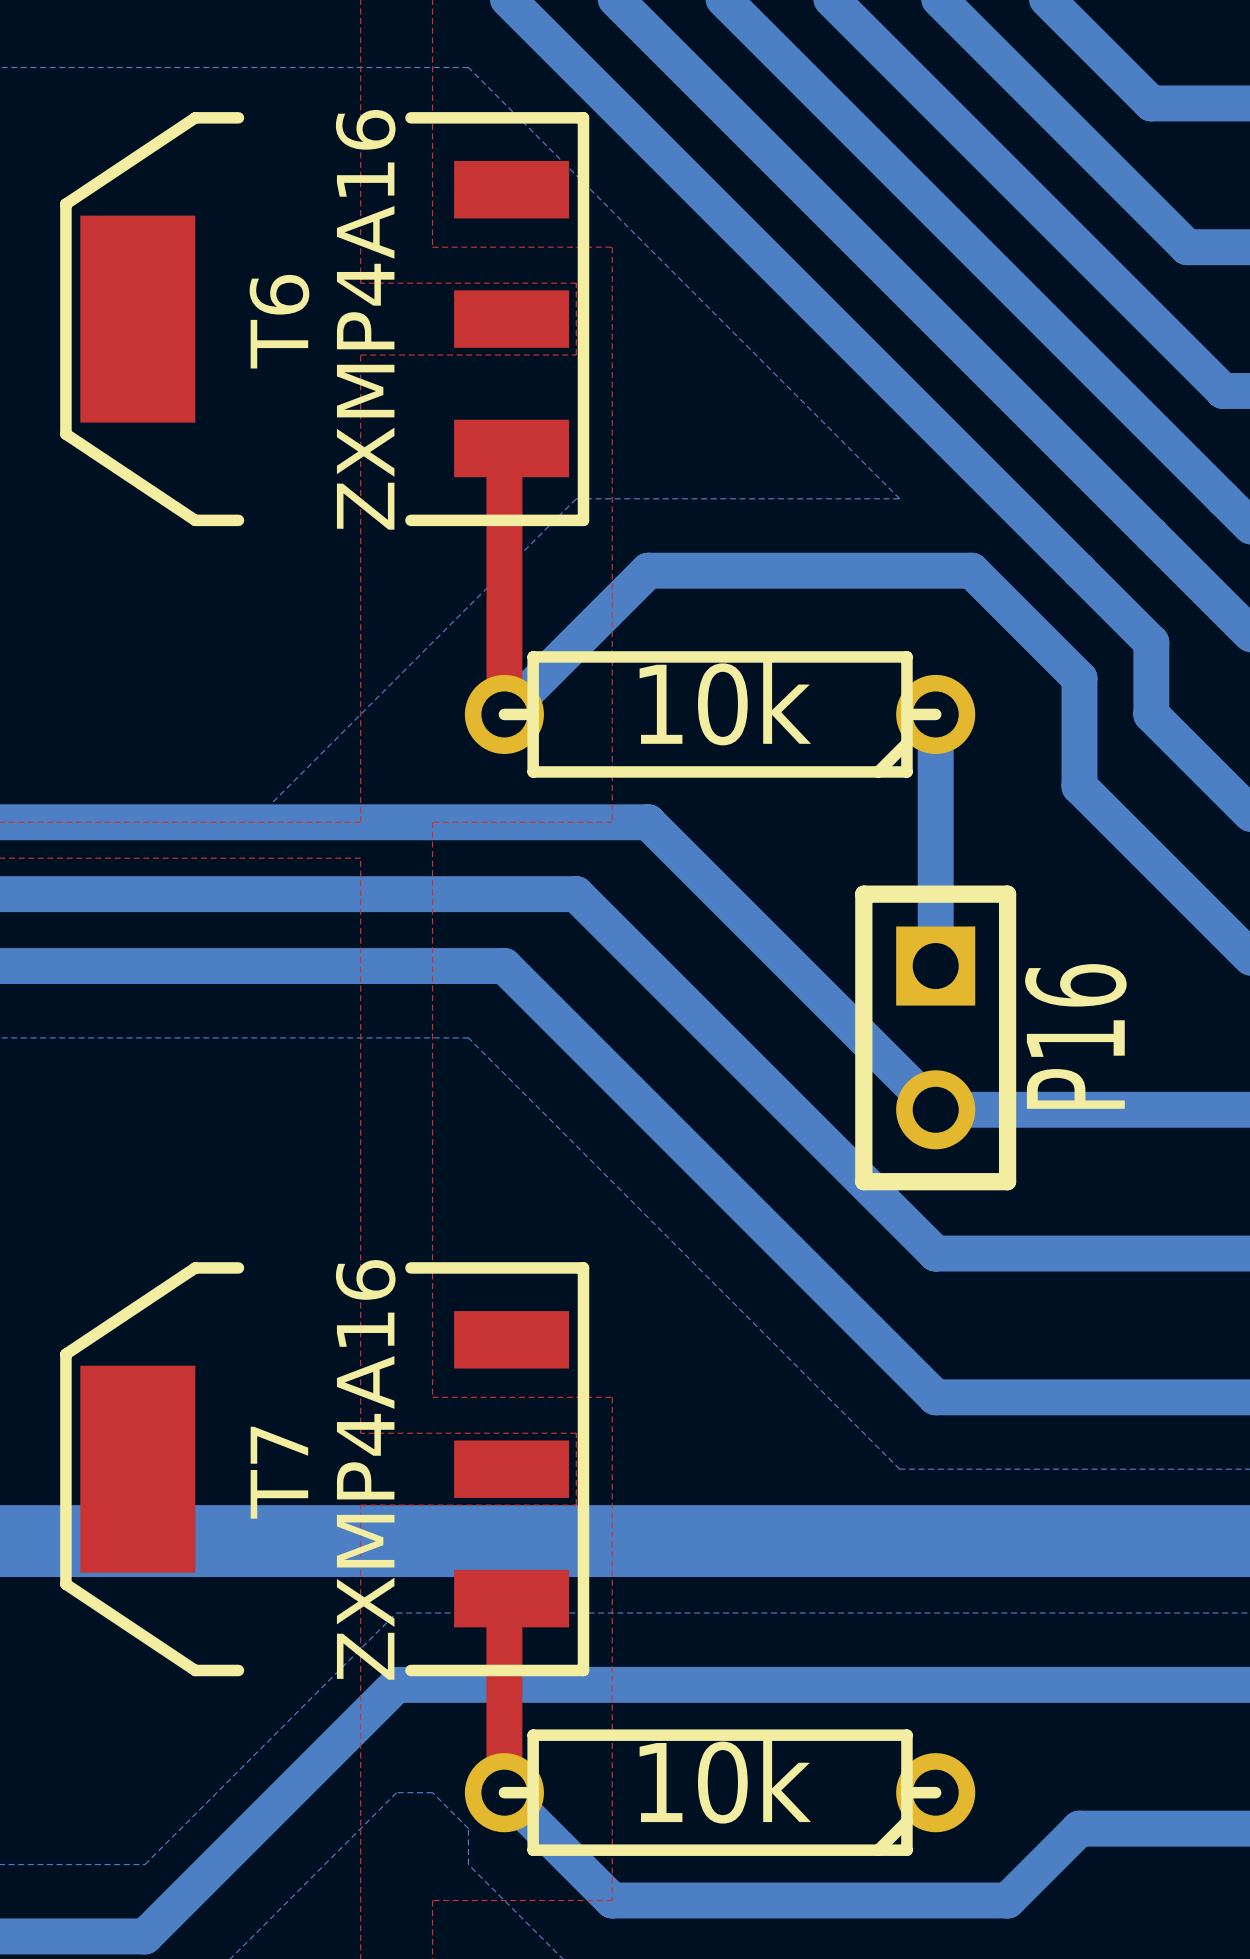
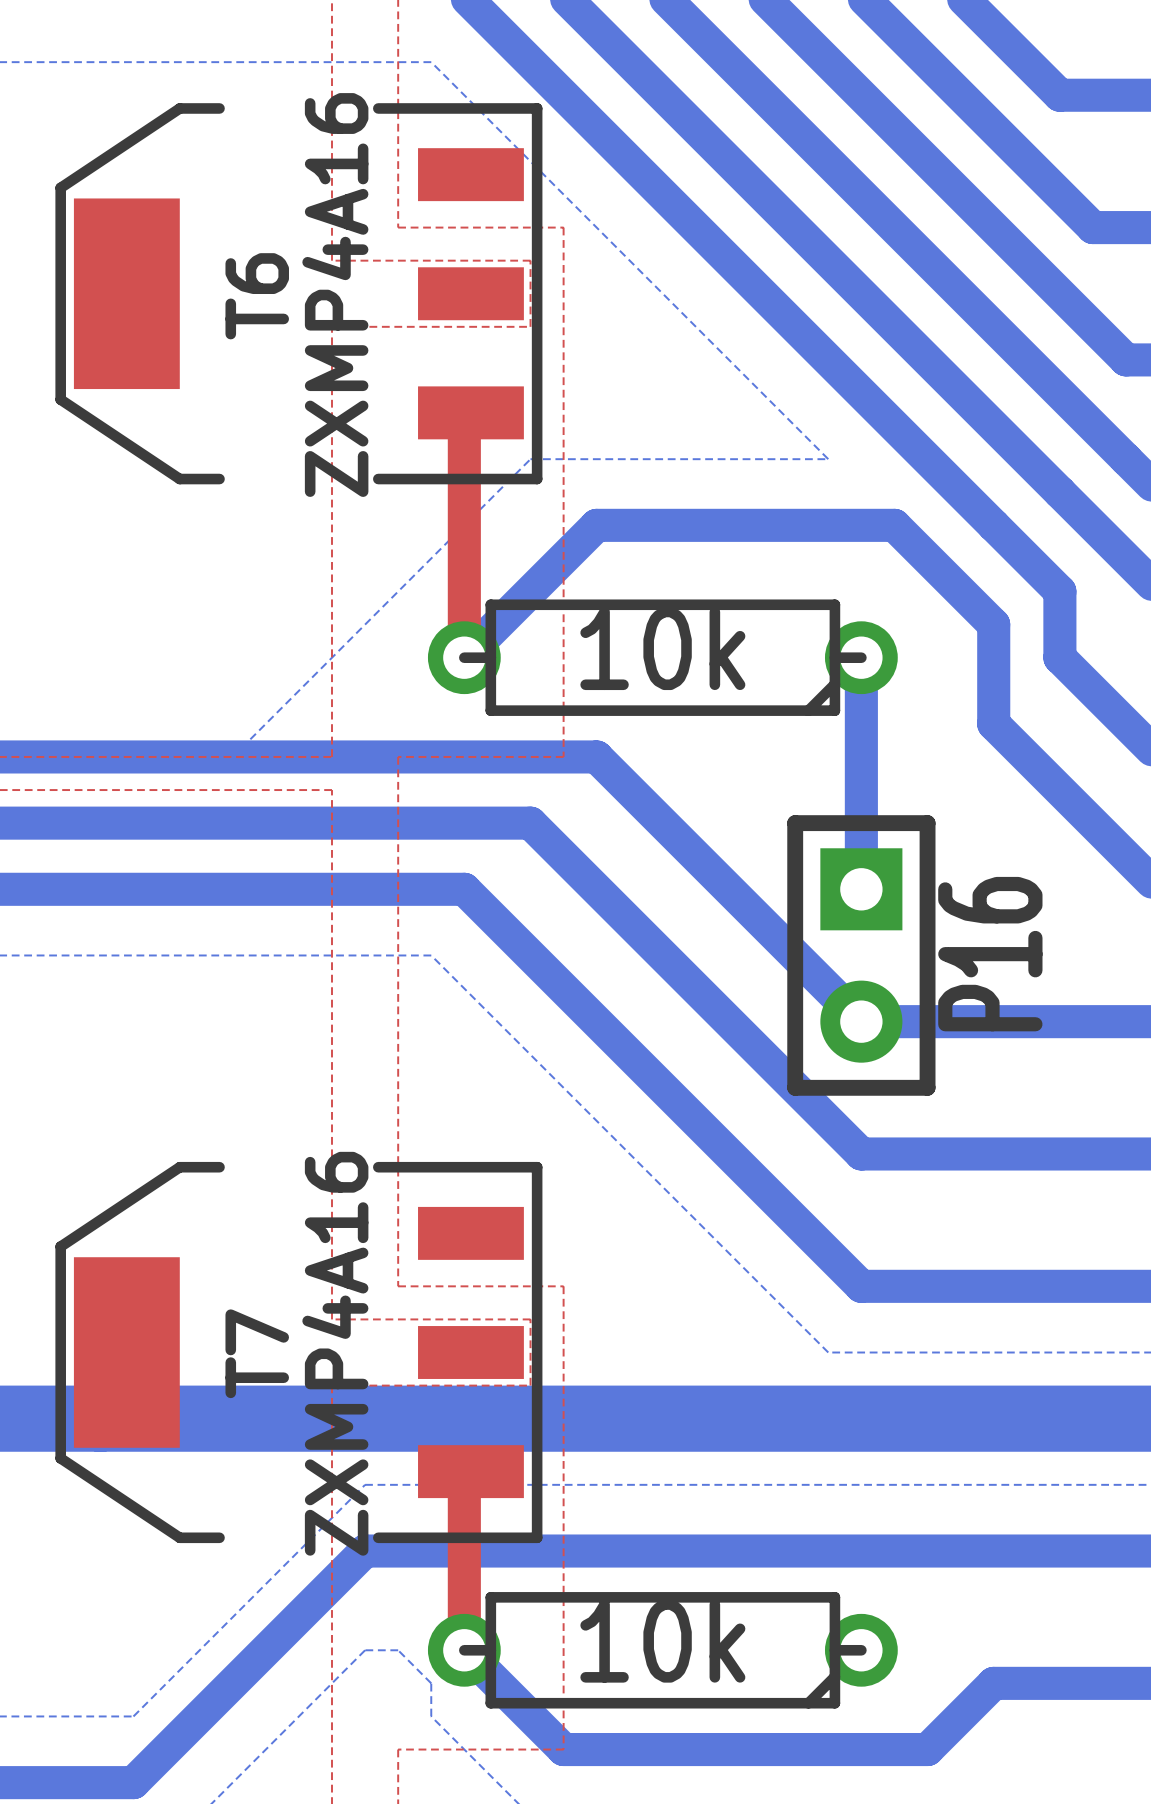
P16 footprint: [855, 885, 1017, 1191] -> [787, 815, 936, 1096]

